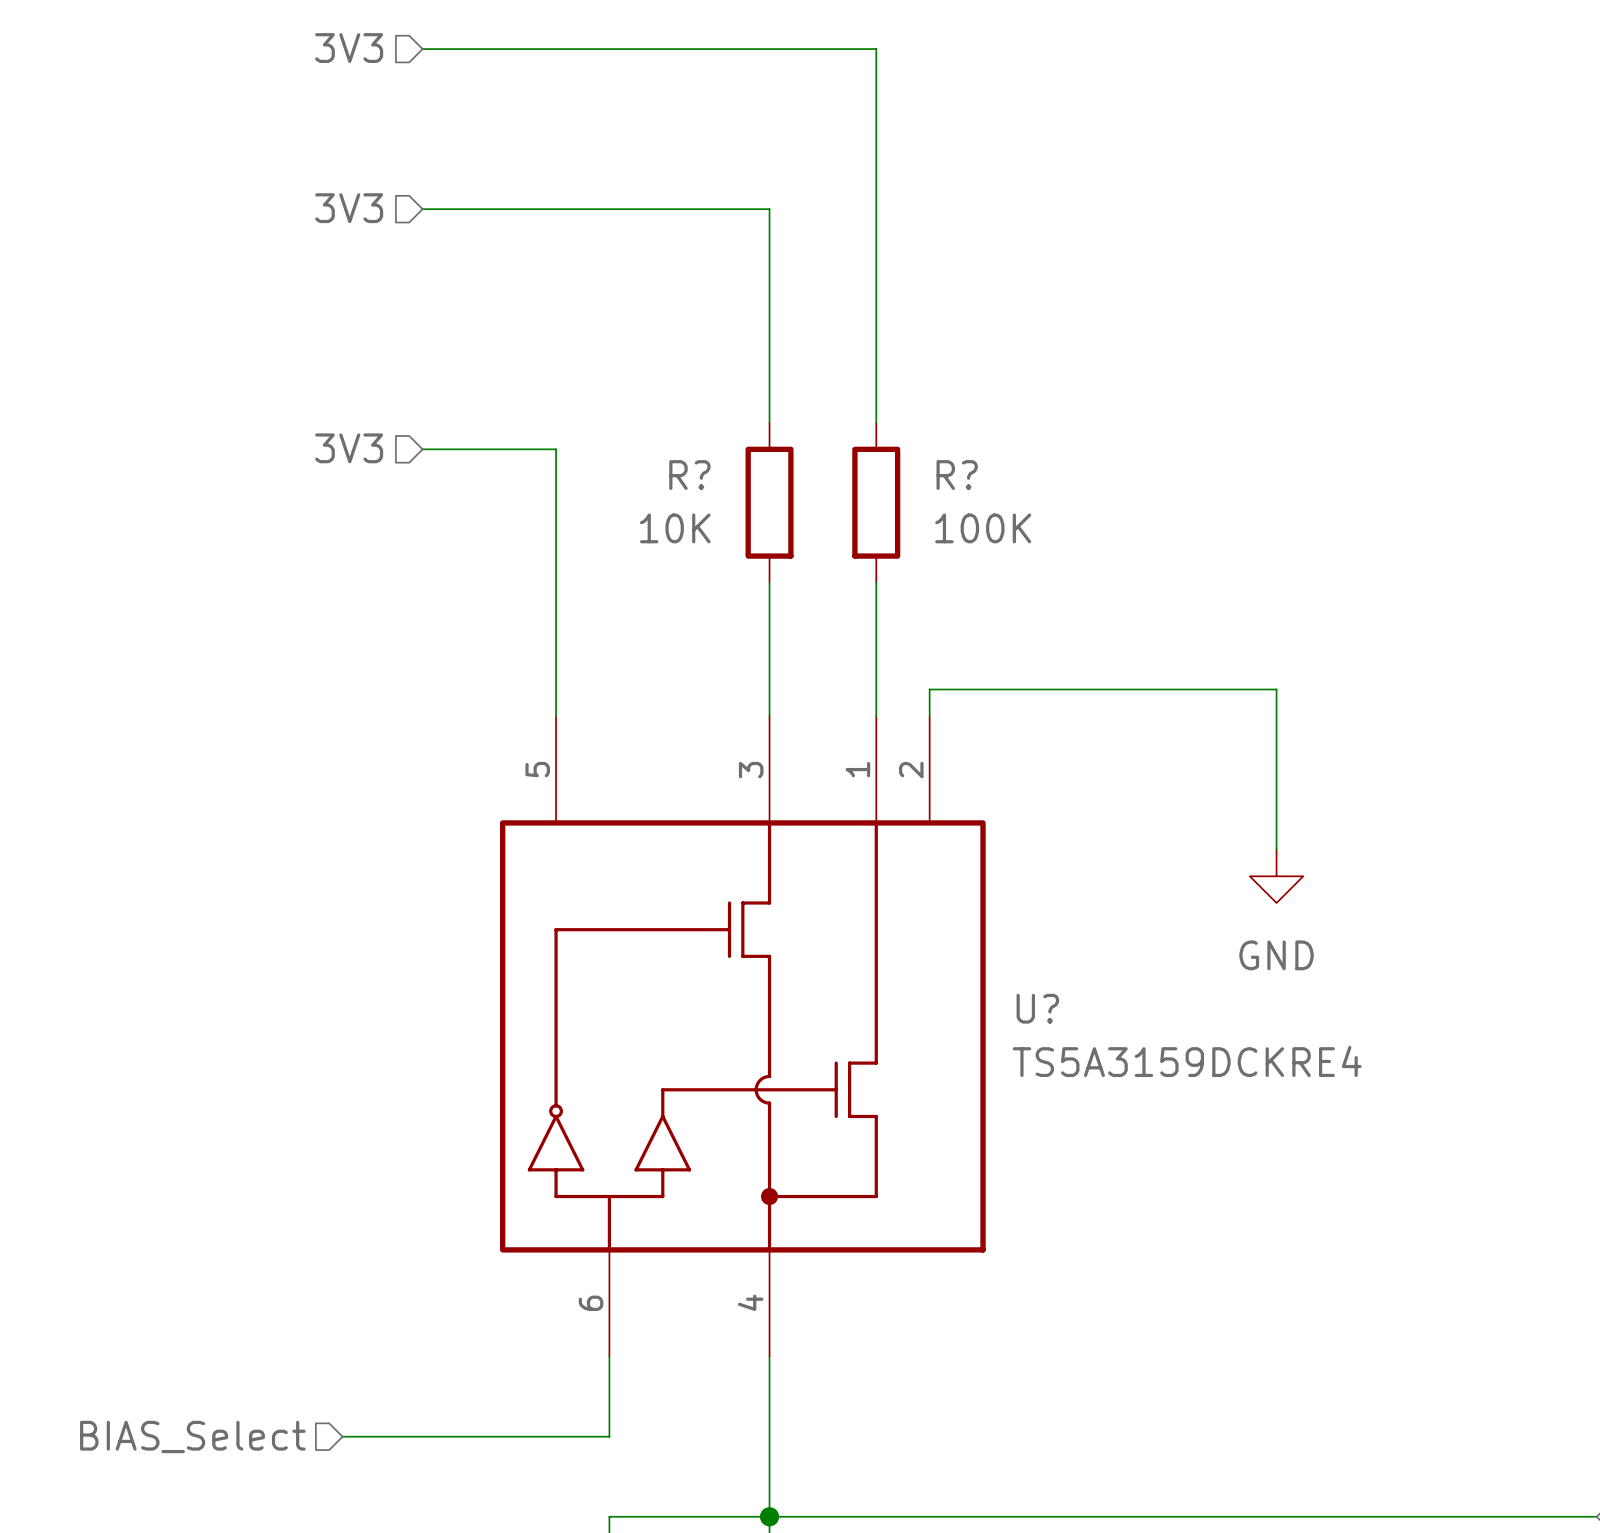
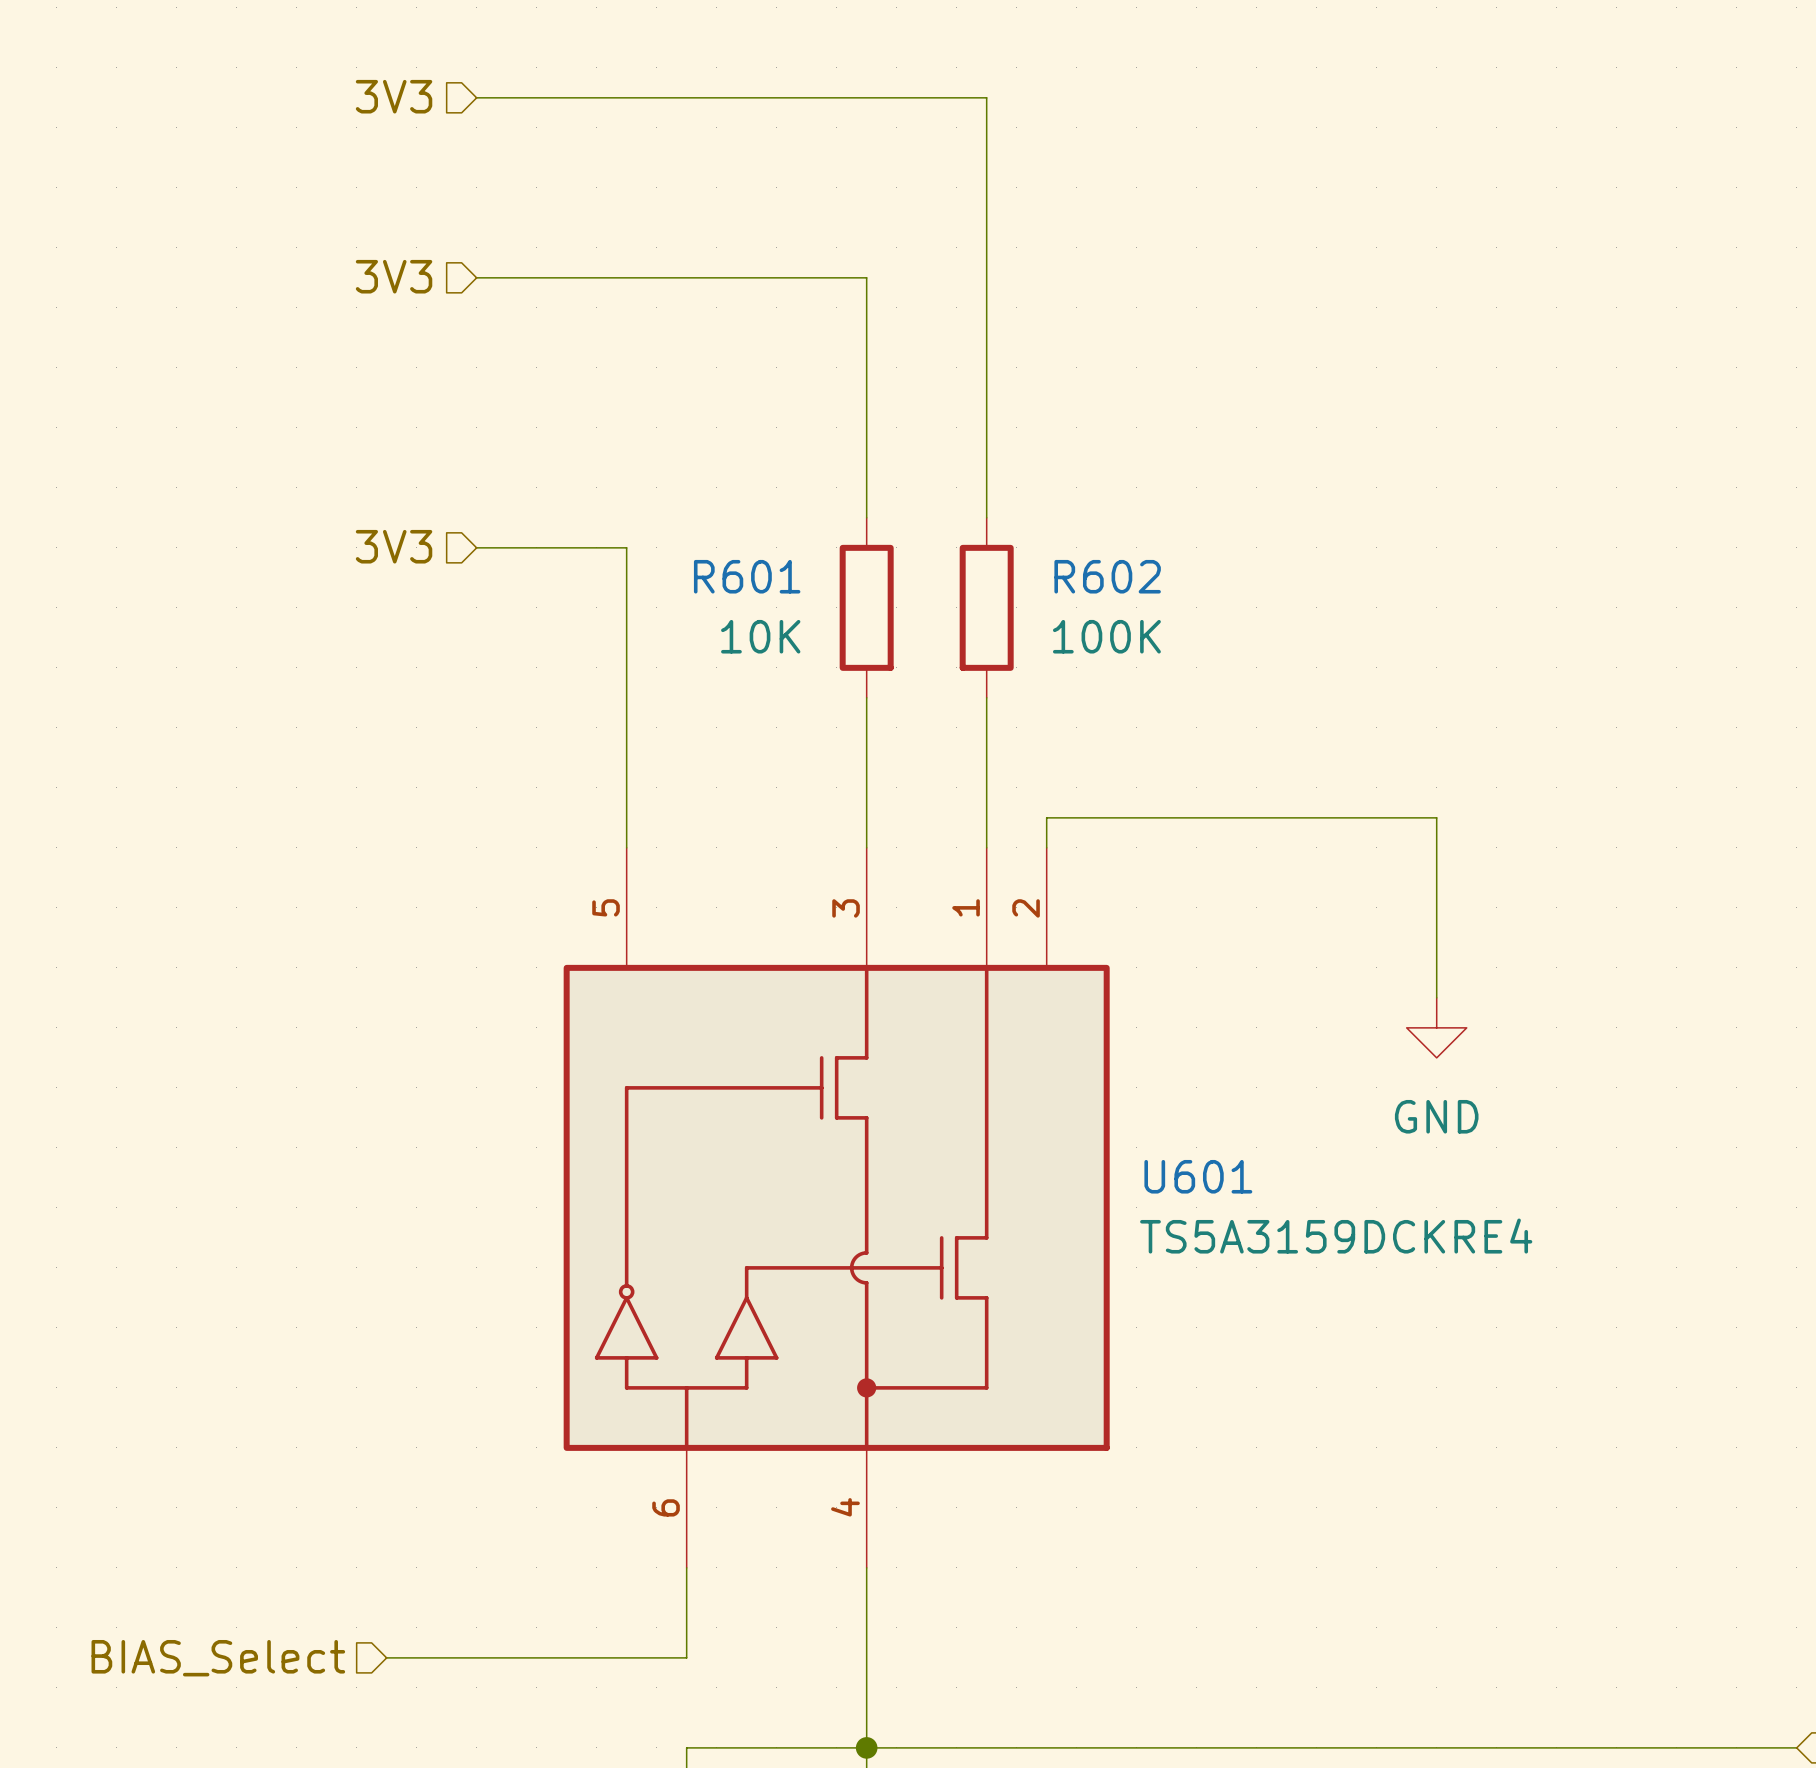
R? name: R? (689, 475) -> R601 (747, 576)
R? name: R? (957, 475) -> R602 (1107, 576)
U? name: U? (1037, 1008) -> U601 (1198, 1176)

